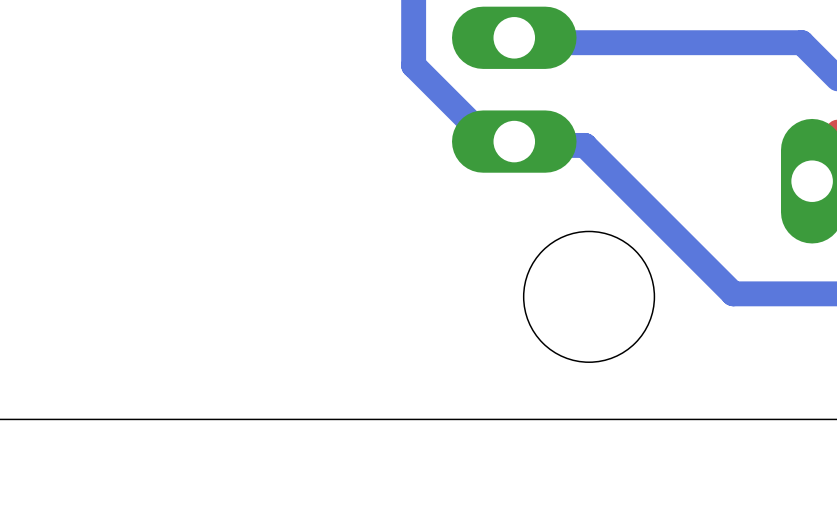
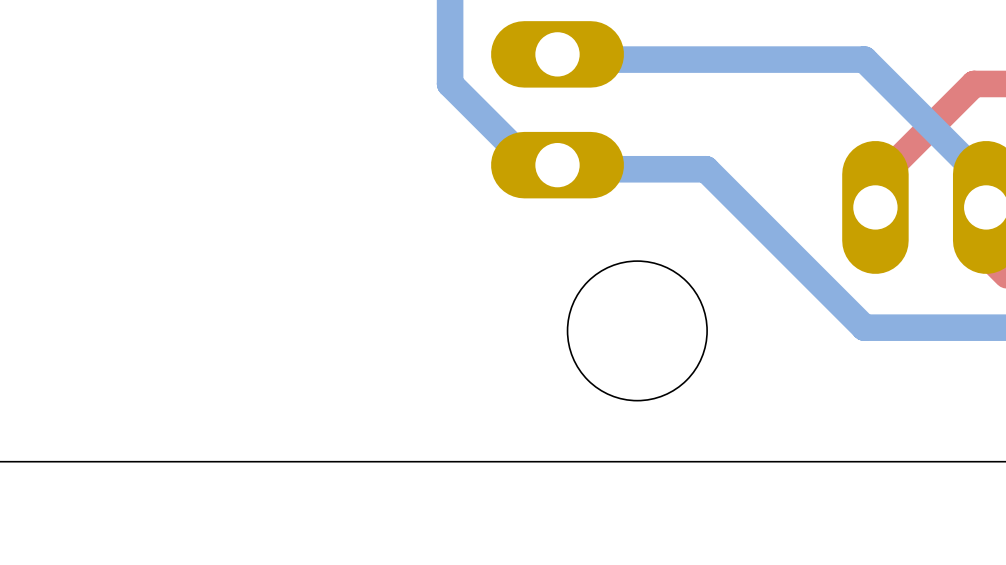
bottom track: (584, 145) (733, 293) (801, 293) -> (632, 169) (705, 169) (864, 327)

